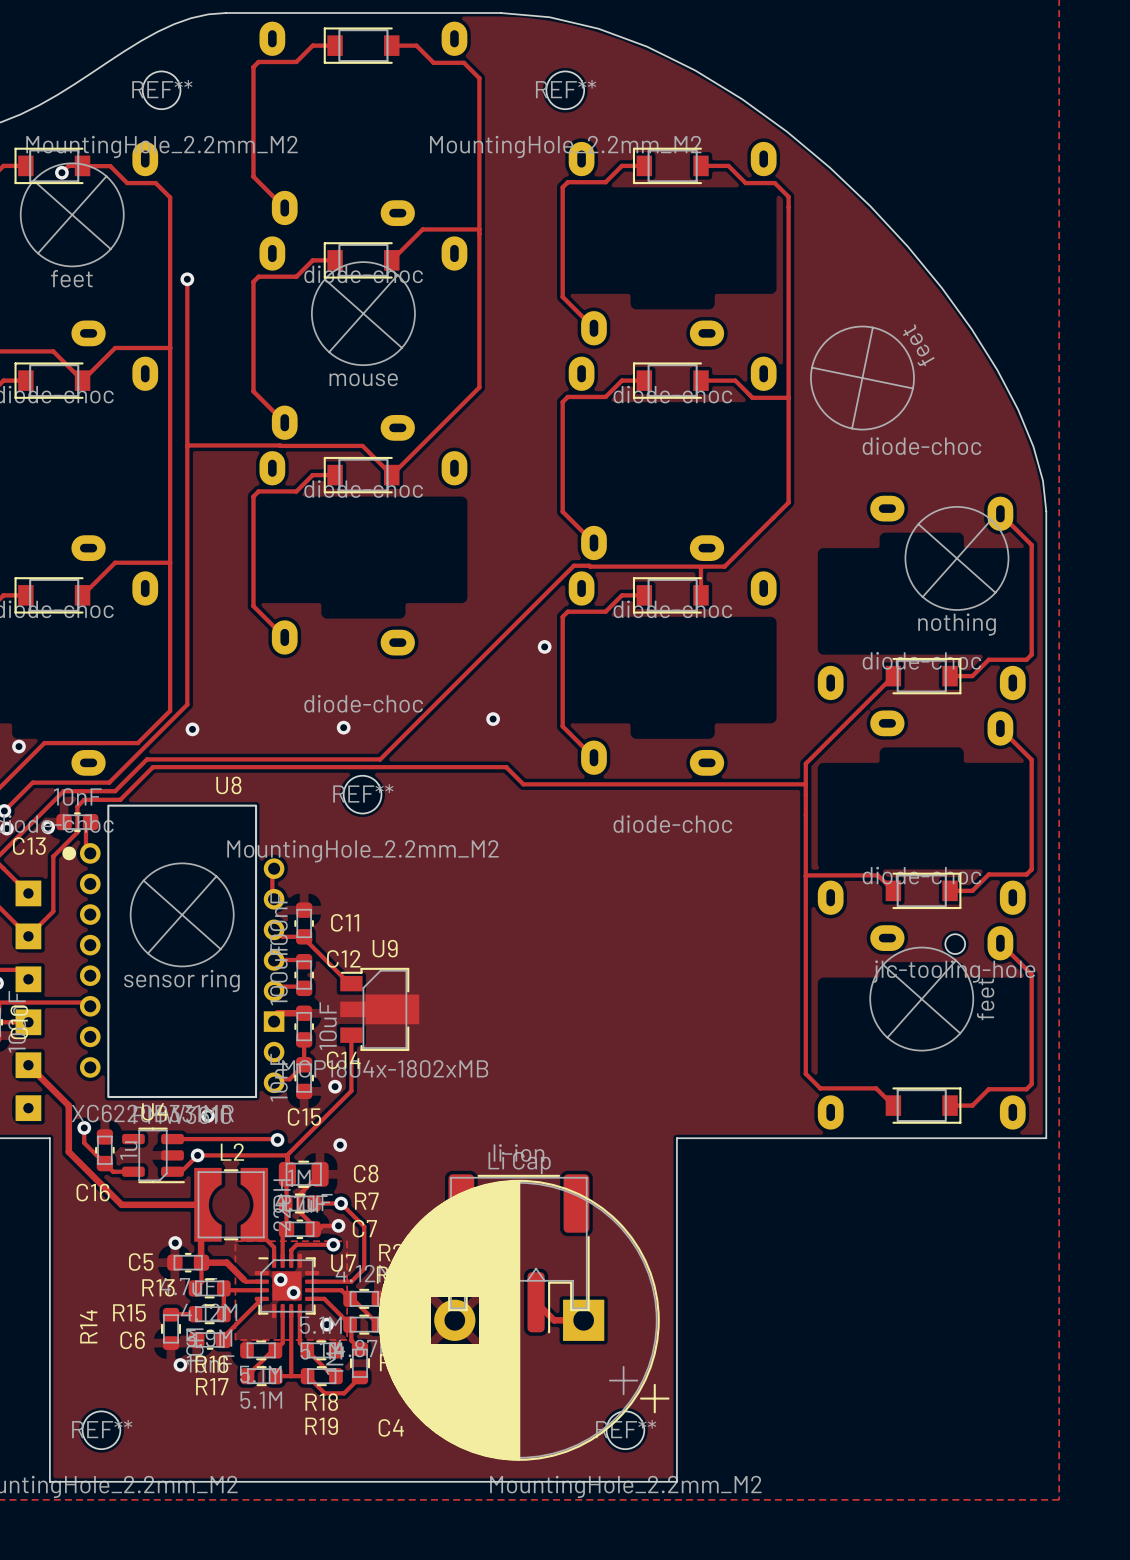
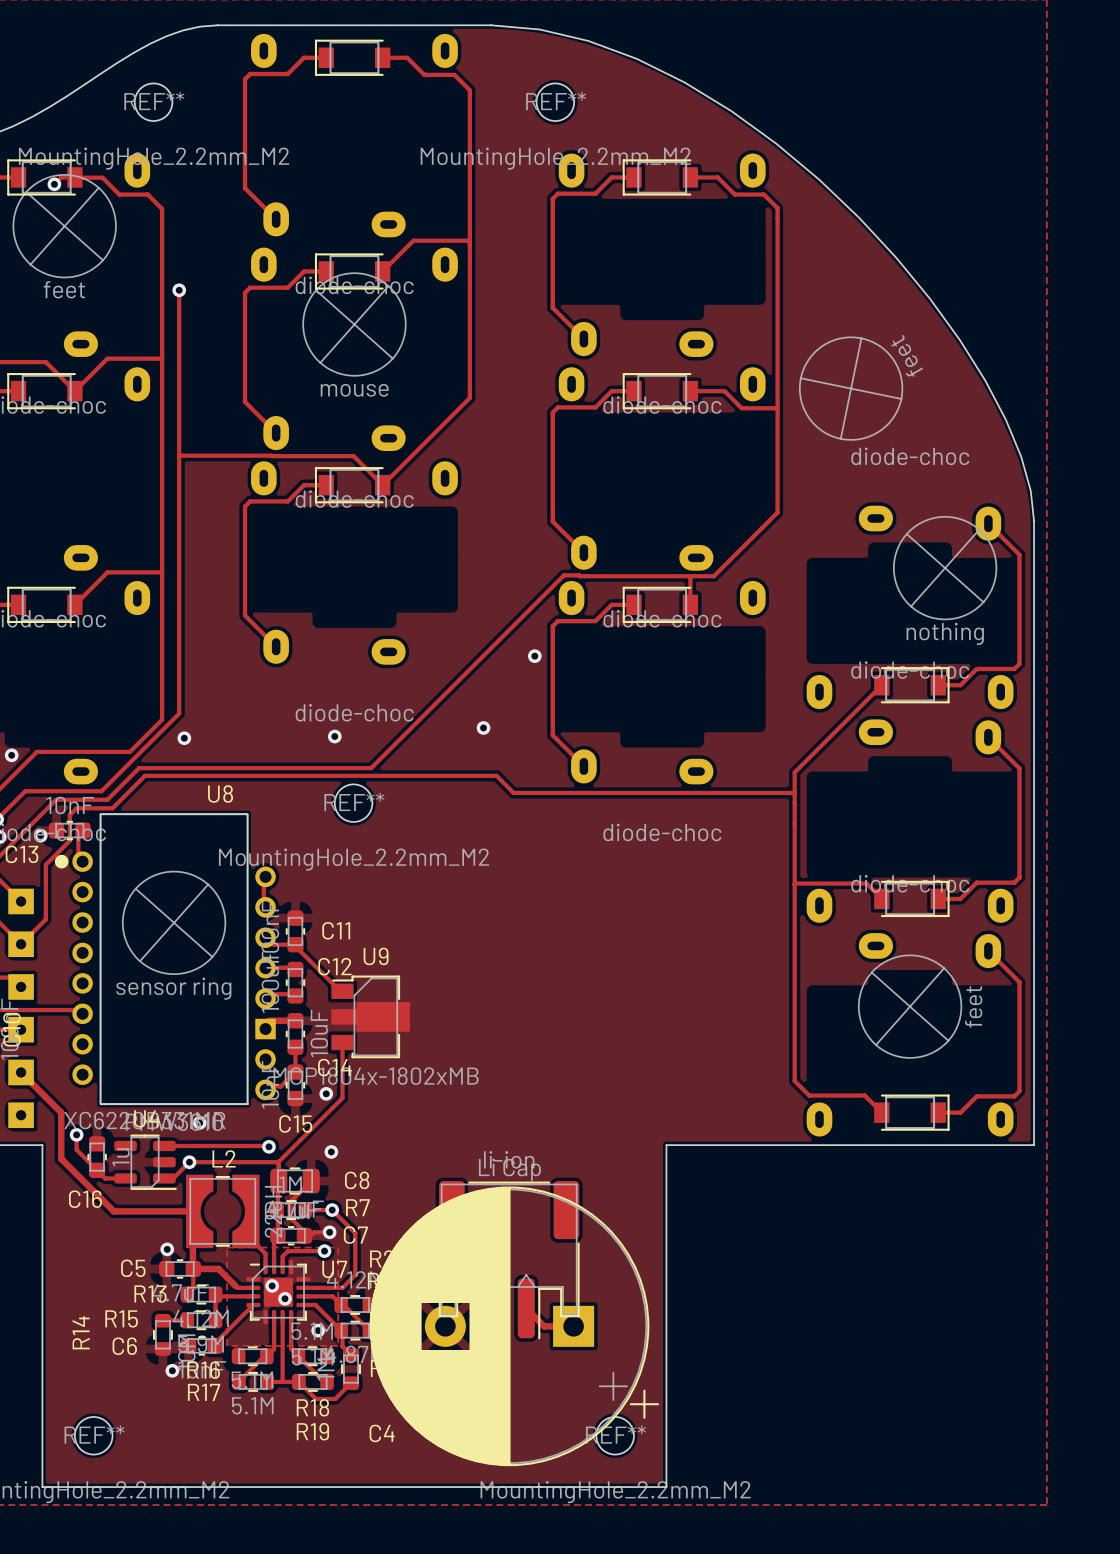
part: jlc-tooling-hole (955, 944) -> none

